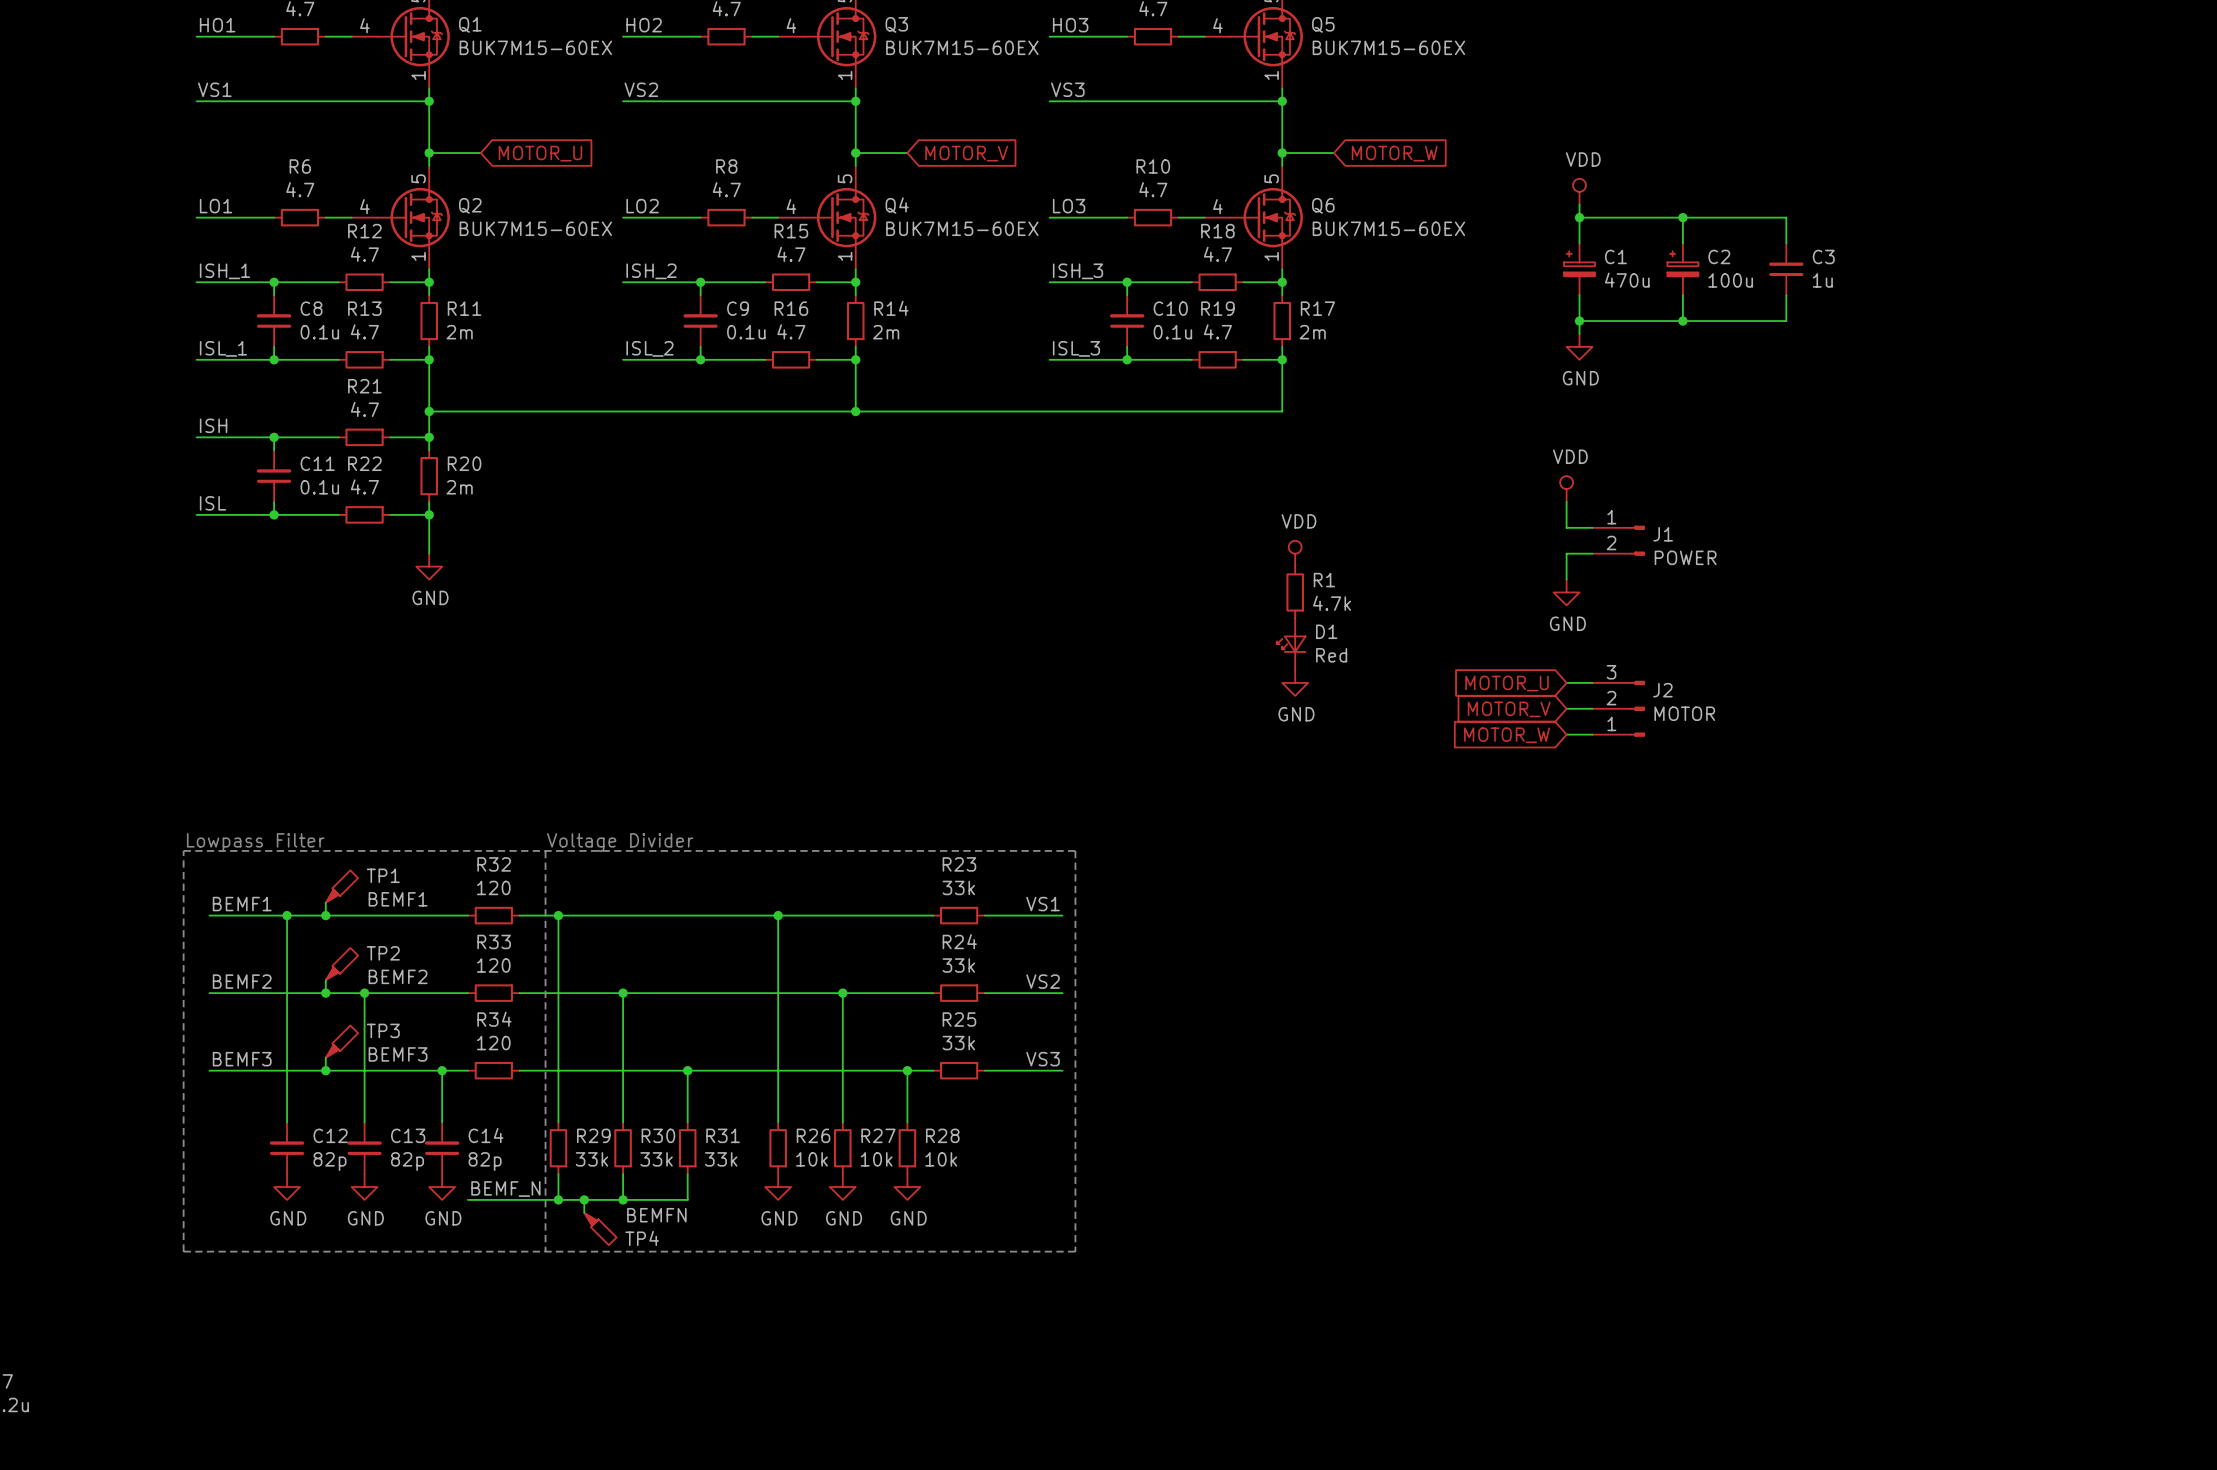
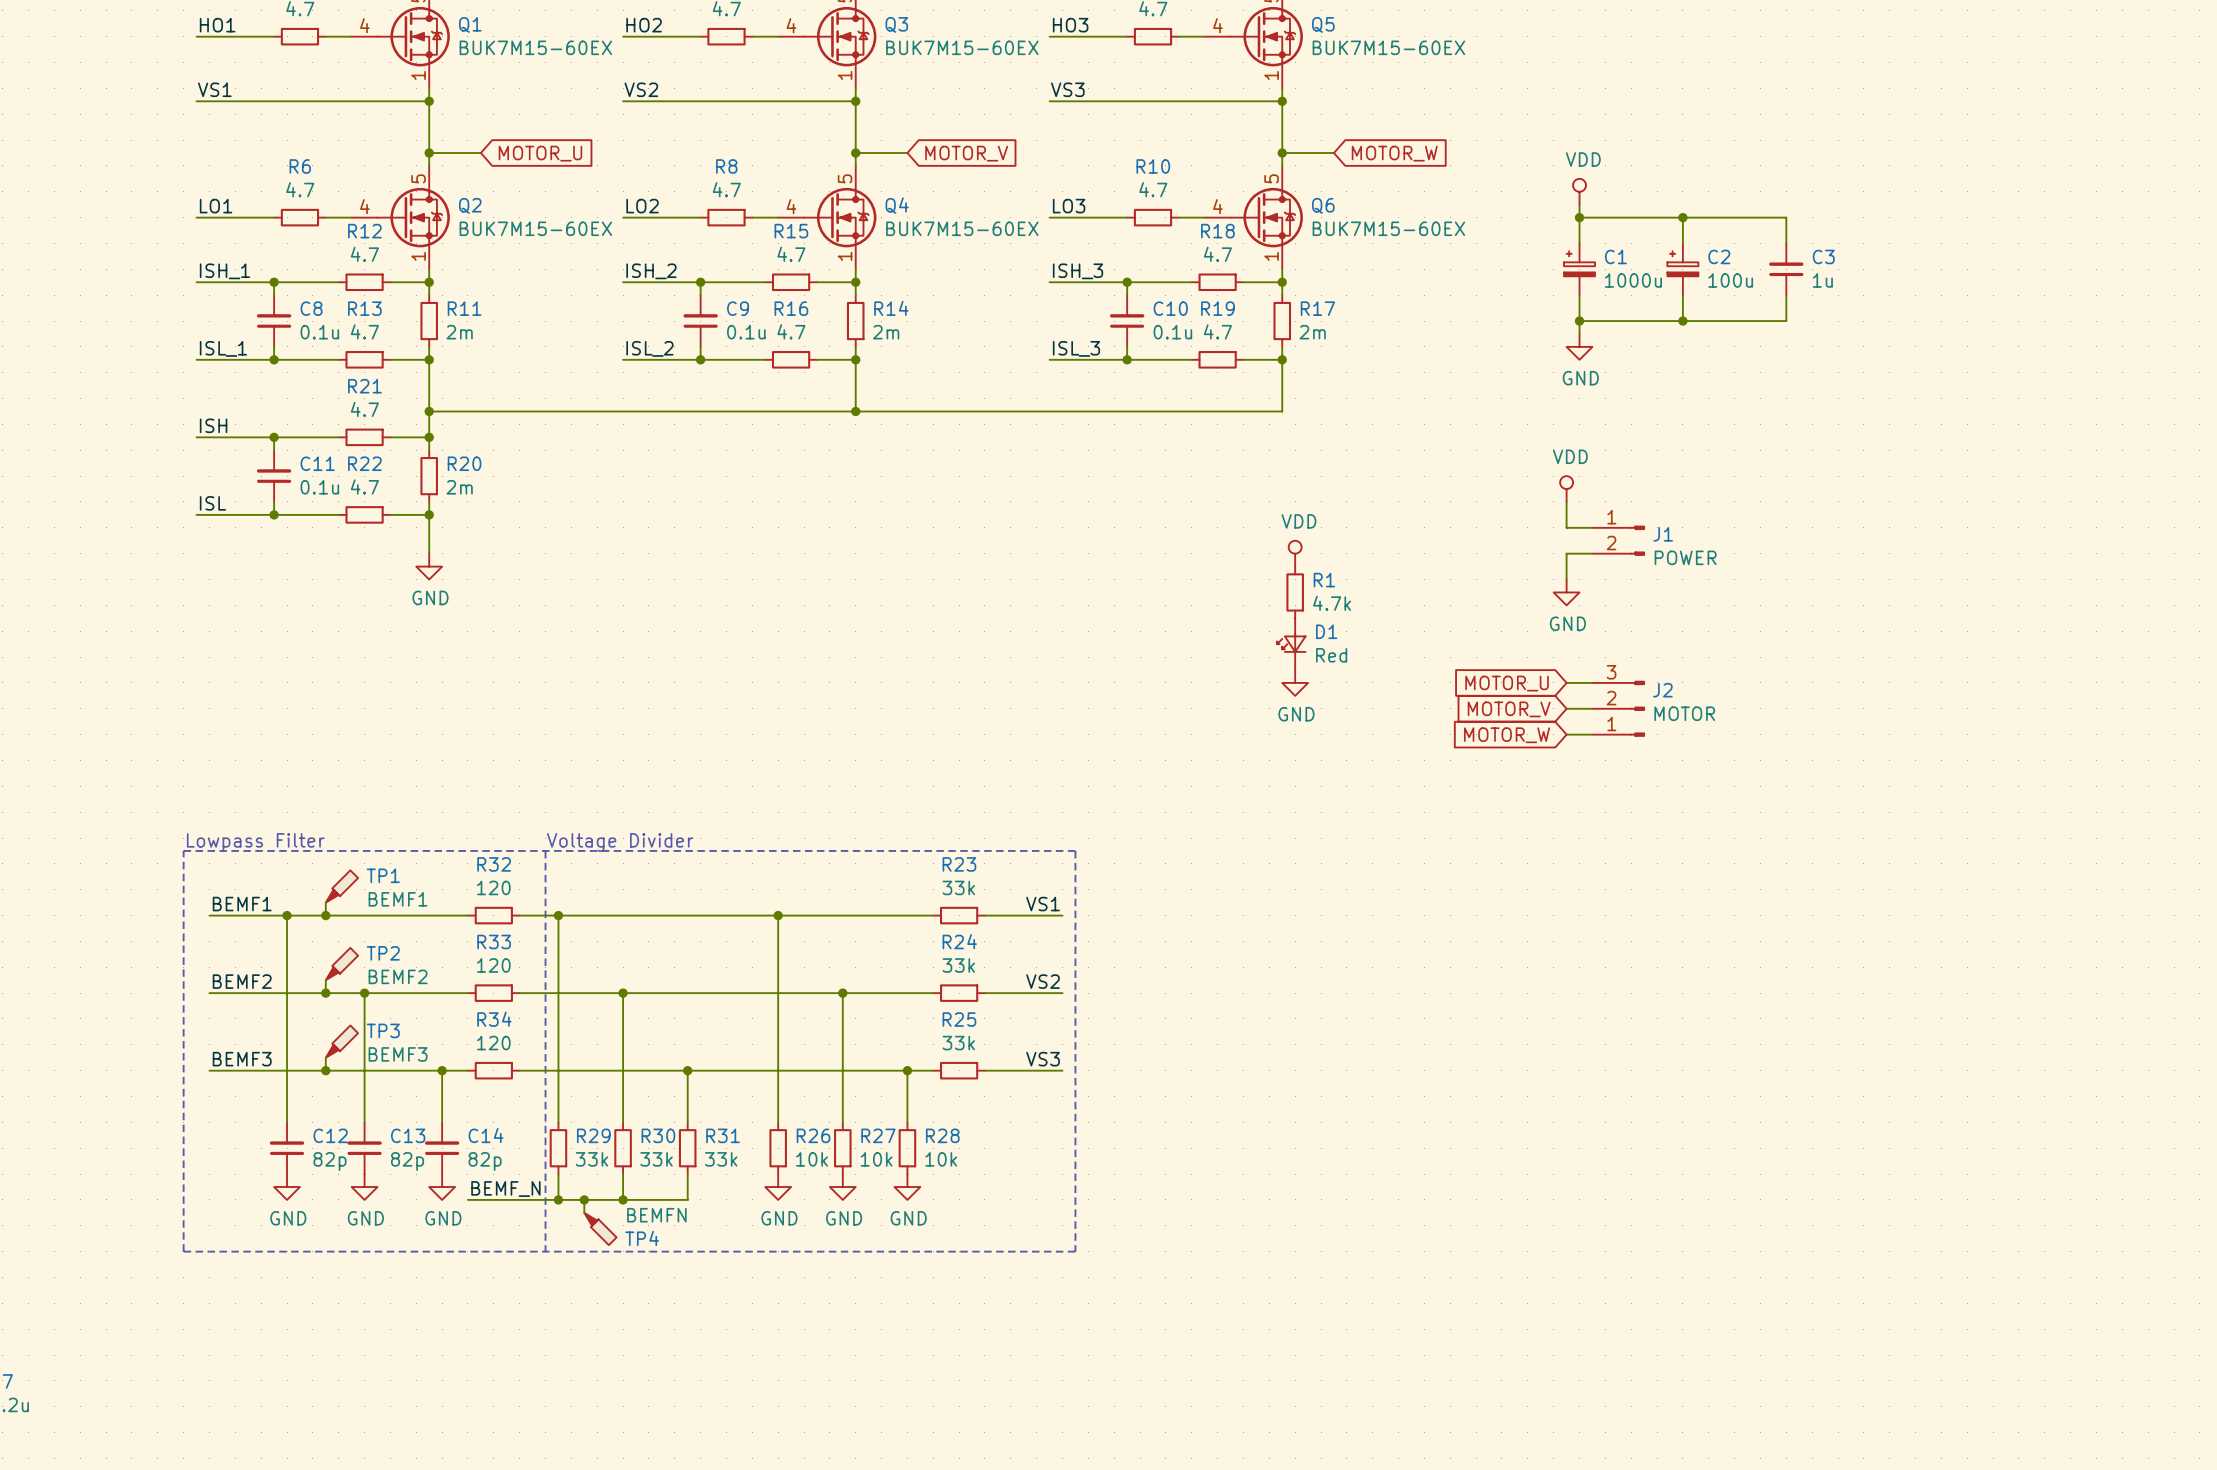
C1 value: 470u (1627, 280) -> 1000u (1633, 280)

